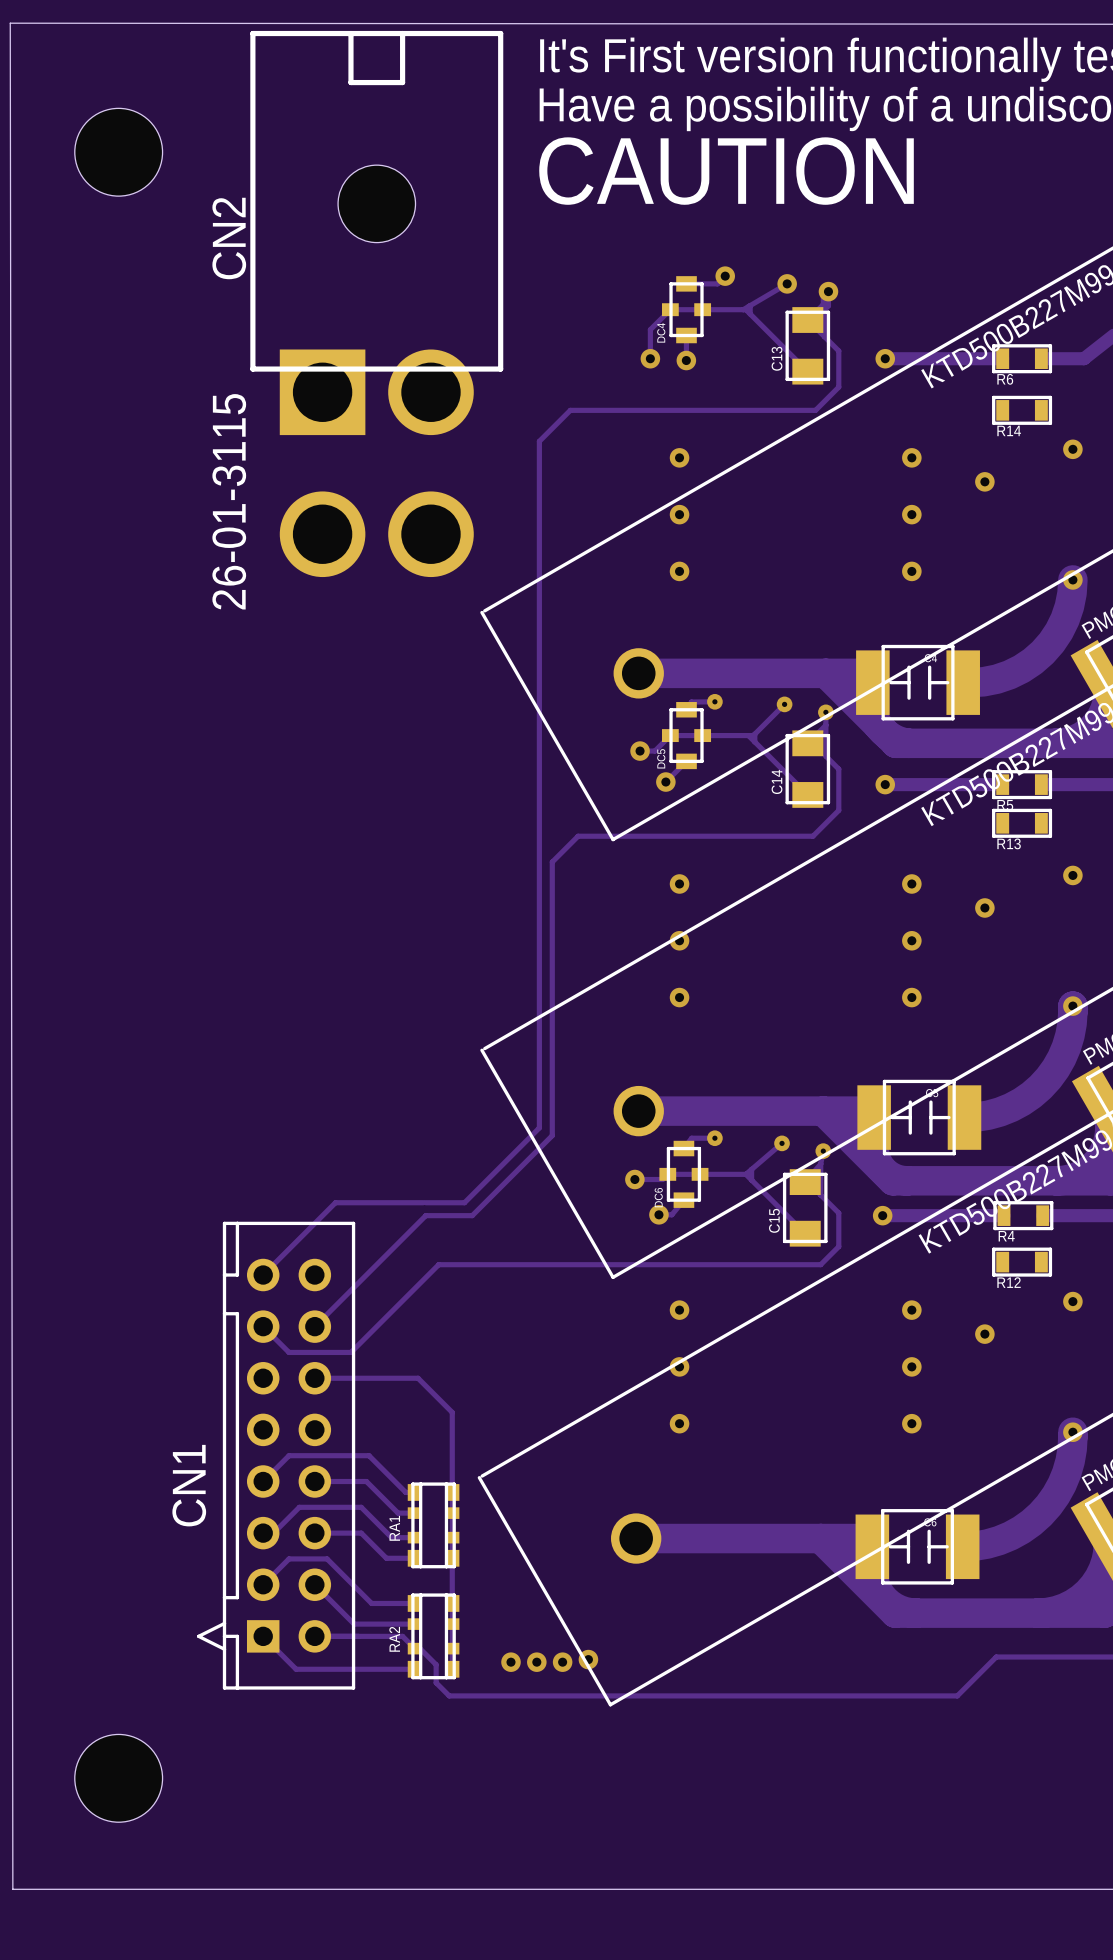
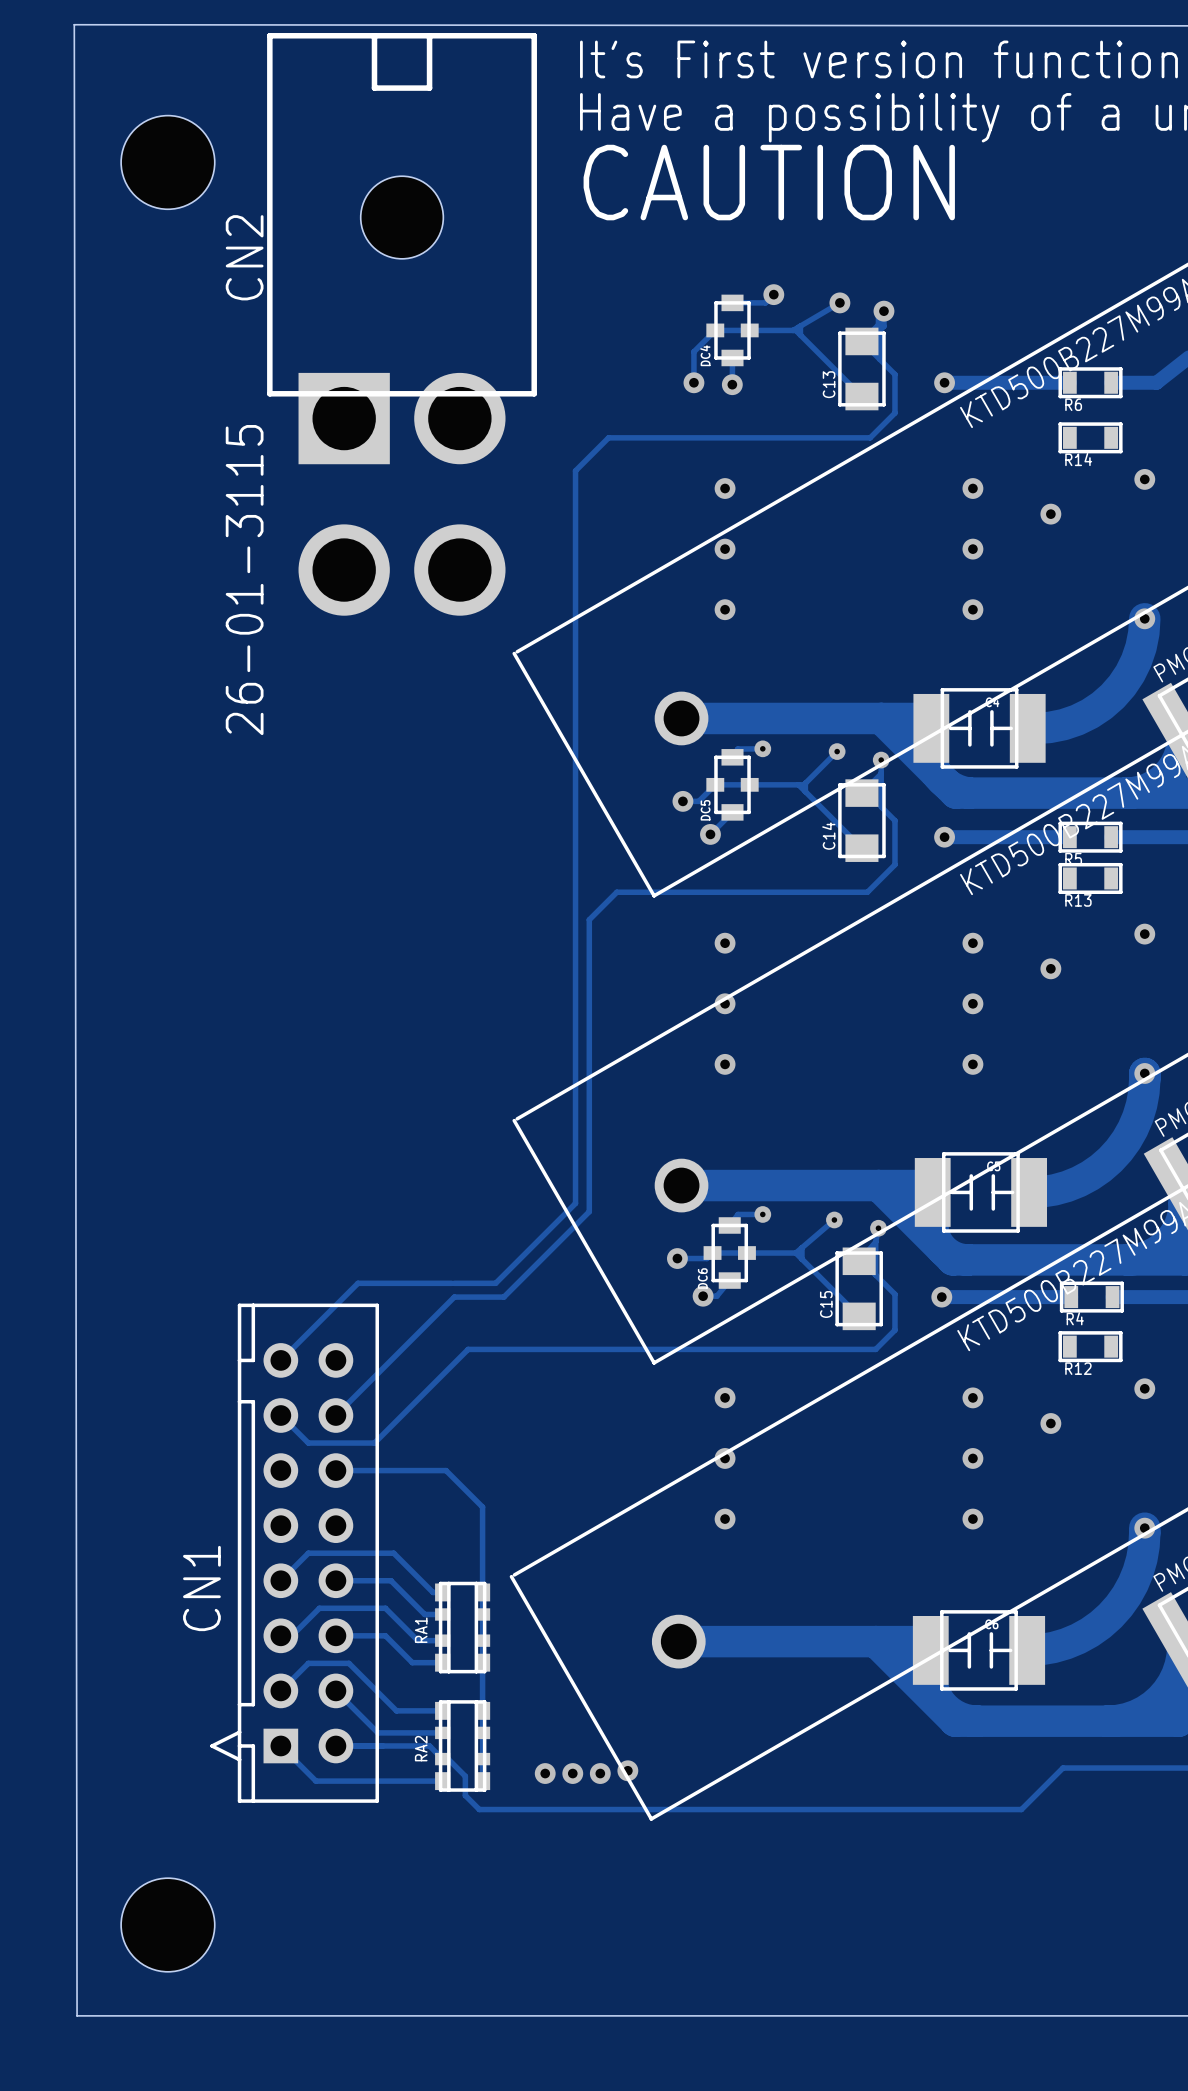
board edge: (69, 23) (10, 23) (12, 1889) (72, 1889) -> (74, 24) (77, 2015)
hole position: (118, 152) -> (167, 162)
hole position: (118, 1778) -> (167, 1925)

